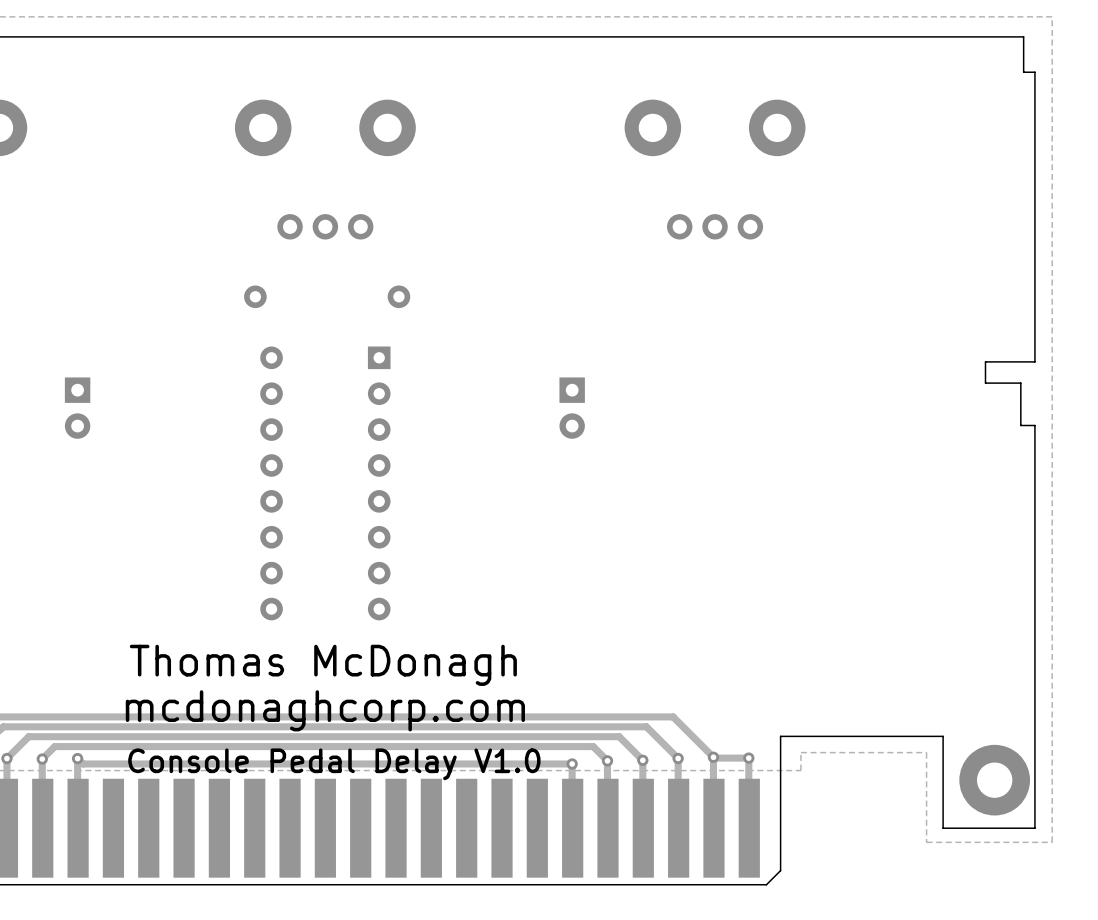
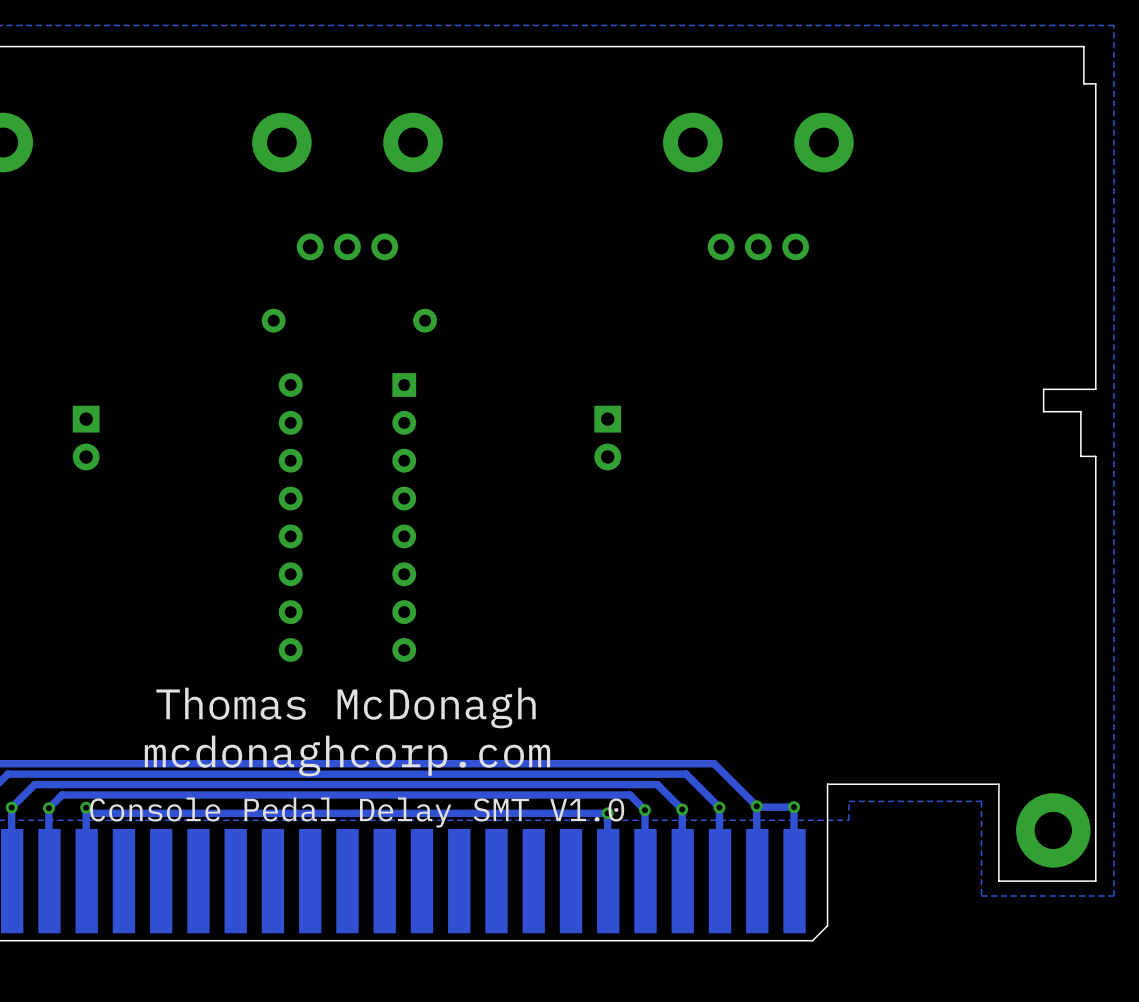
text: Console Pedal Delay V1.0 (334, 764) -> Console Pedal Delay SMT V1.0 (357, 812)

